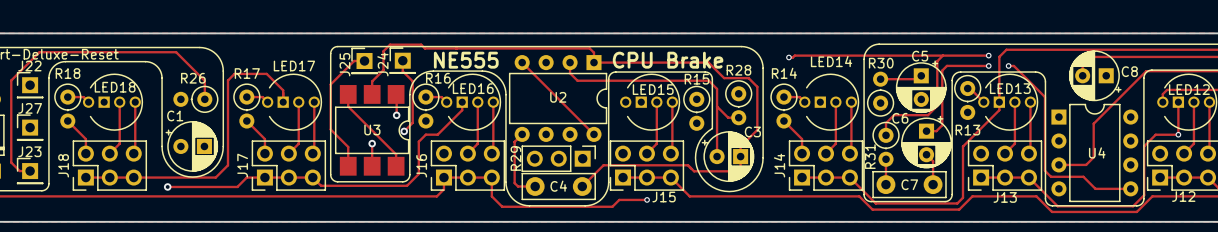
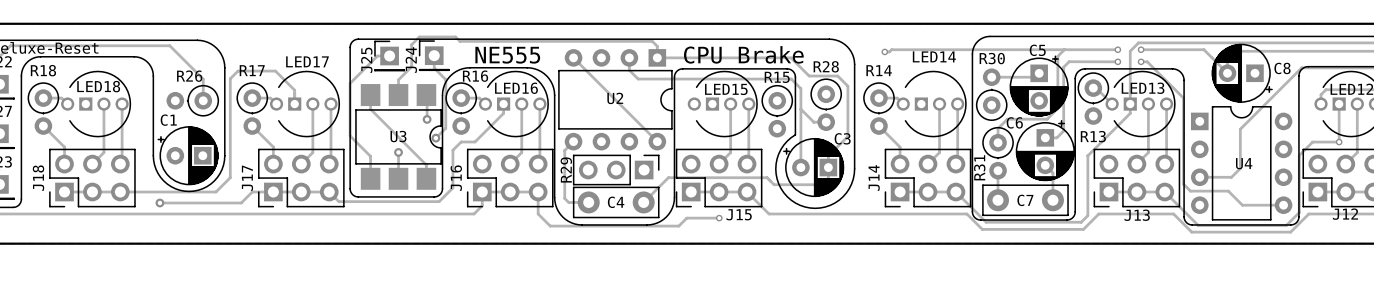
track: none -> (1141, 49) (1203, 49) (1227, 73)
via: none -> (1141, 49)

